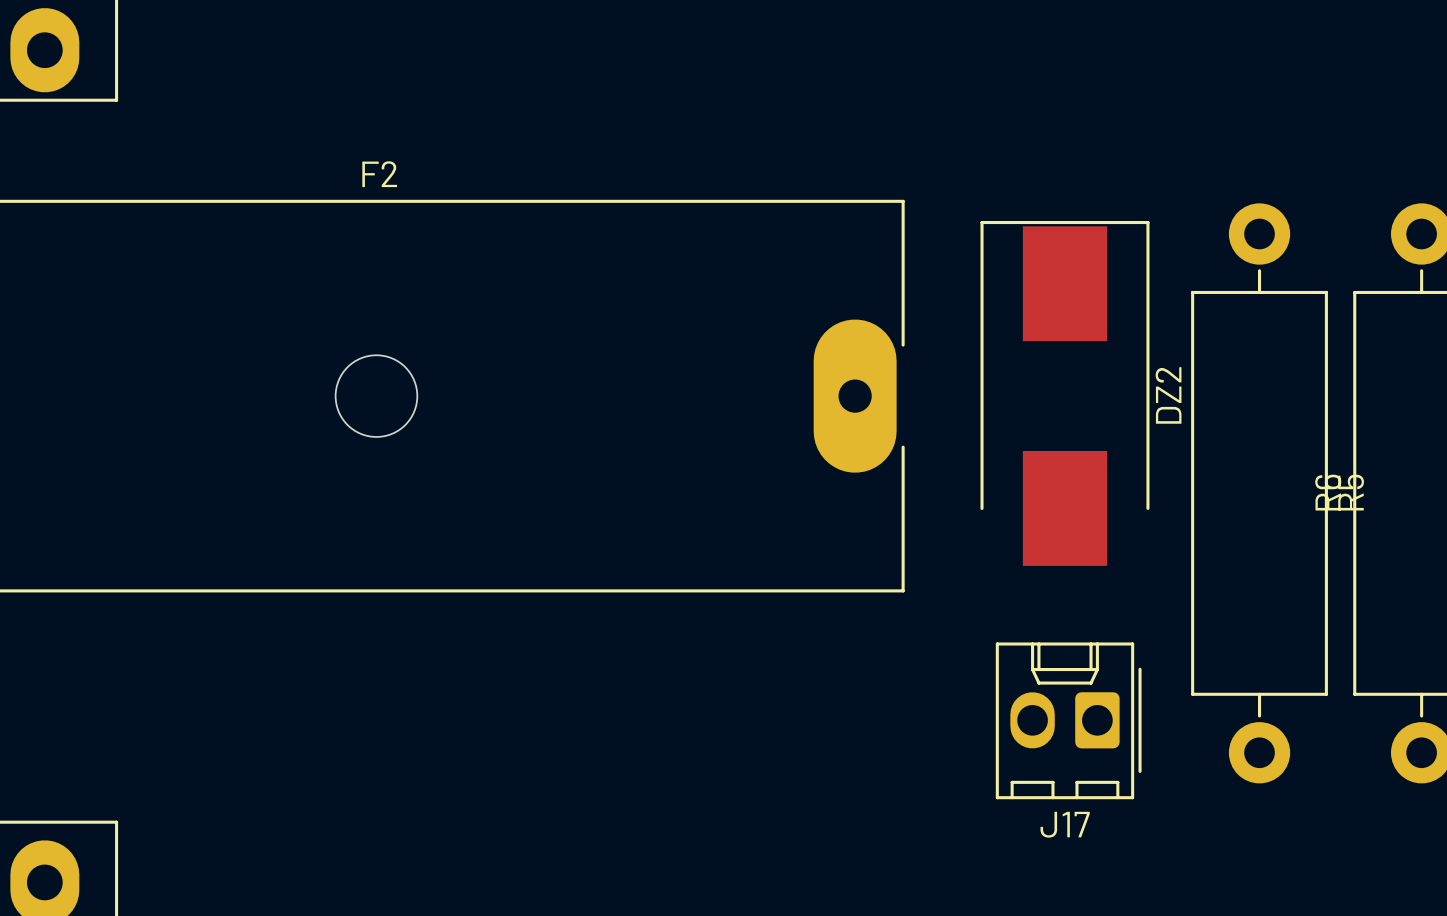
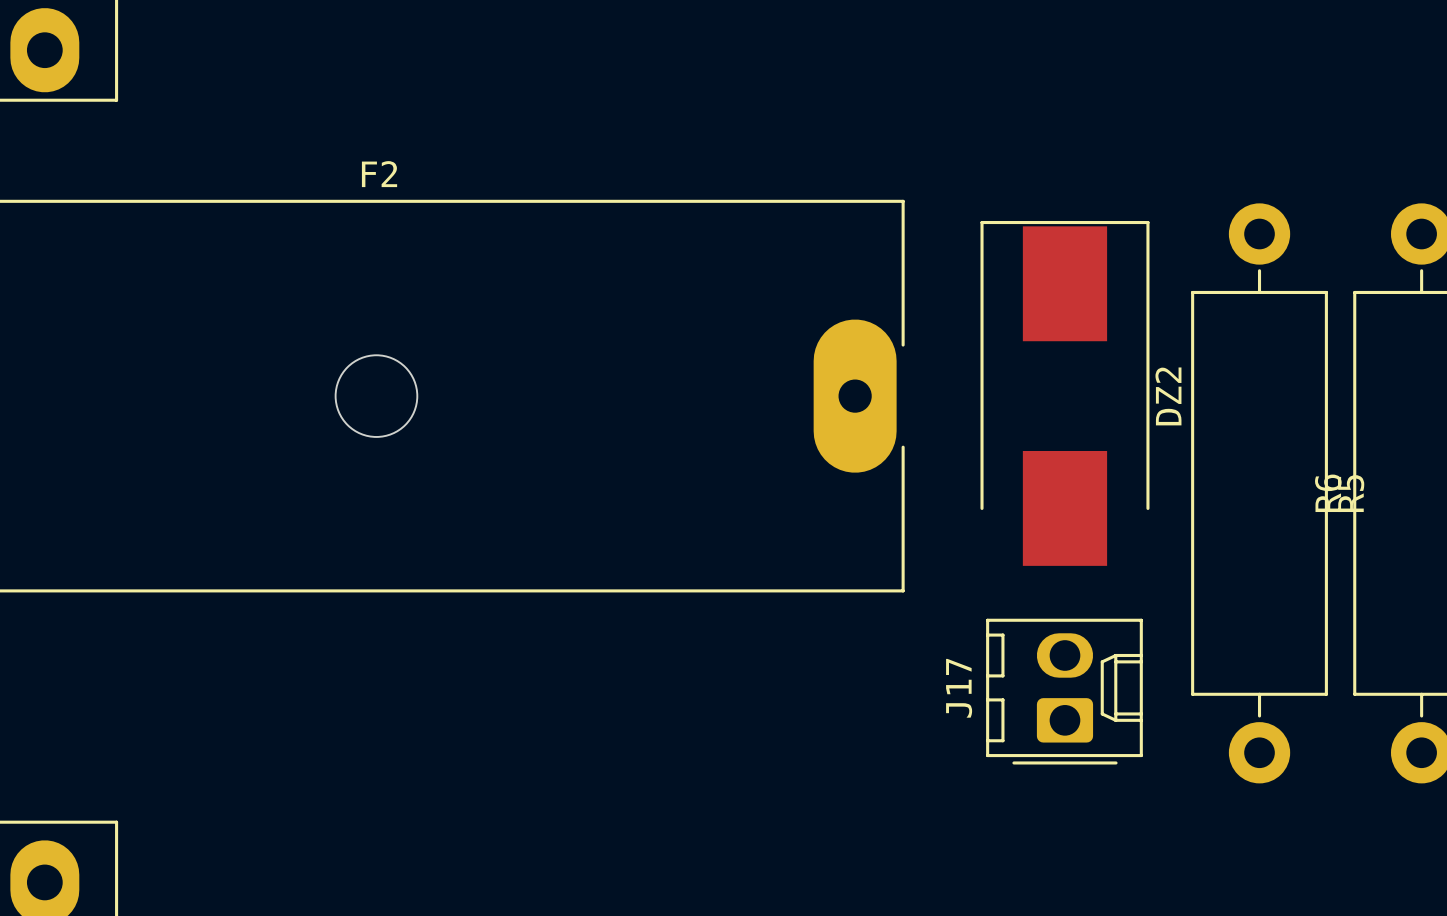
J17 rotation: 0° (1068, 720) -> 90° clockwise (1064, 691)

